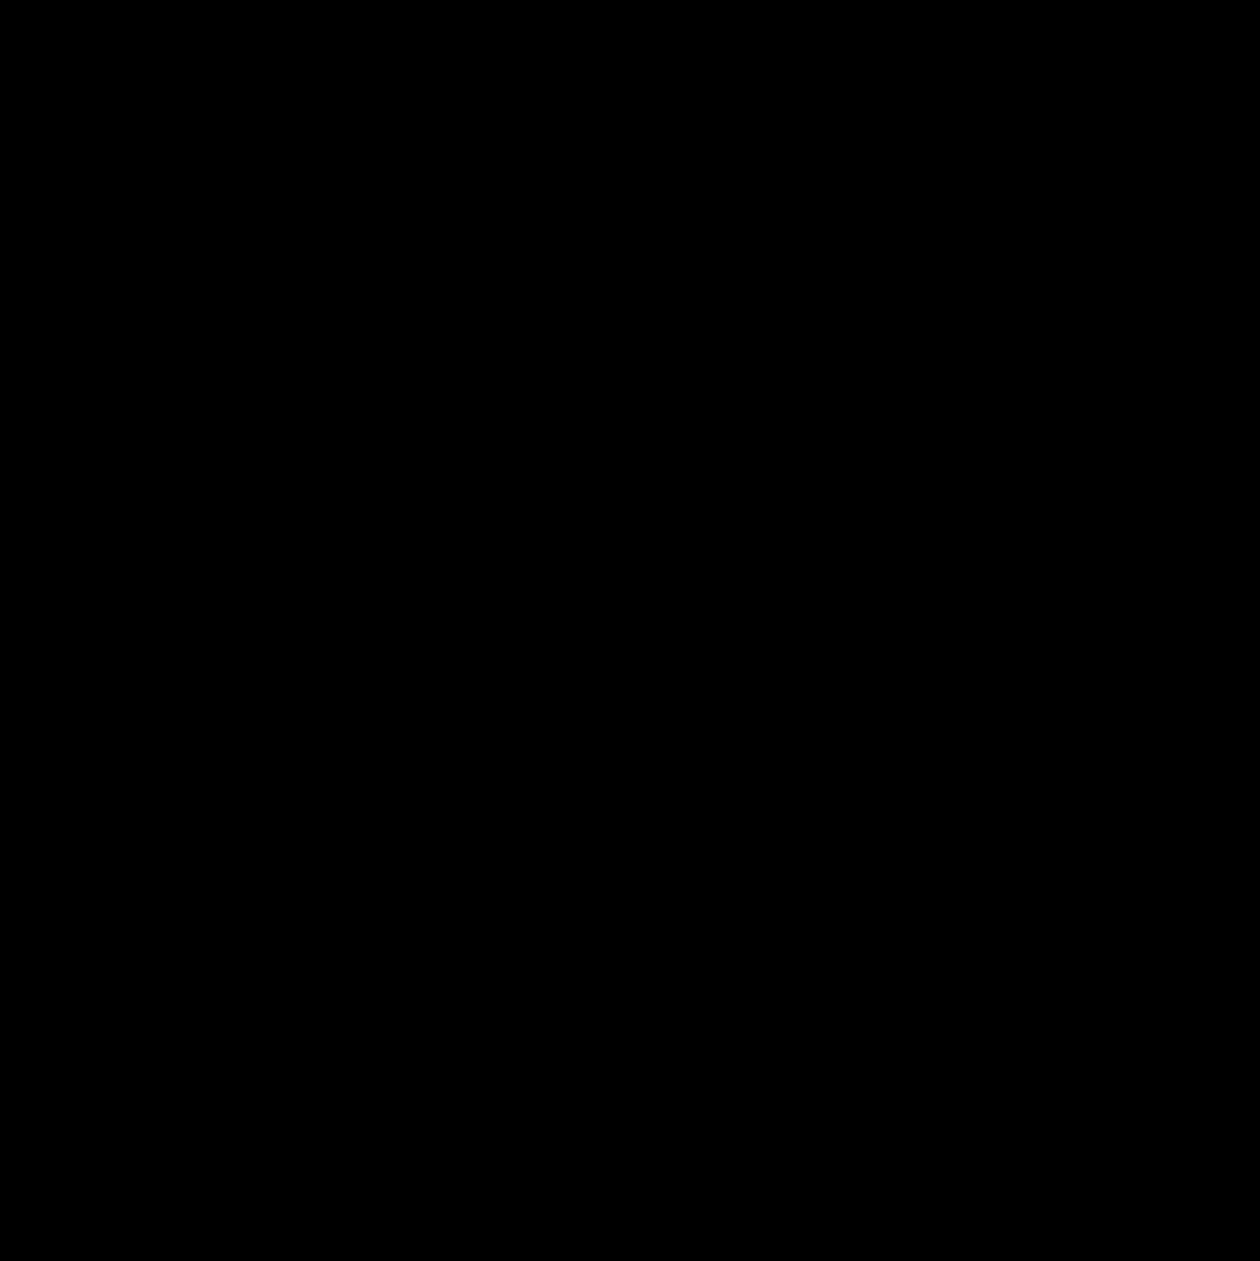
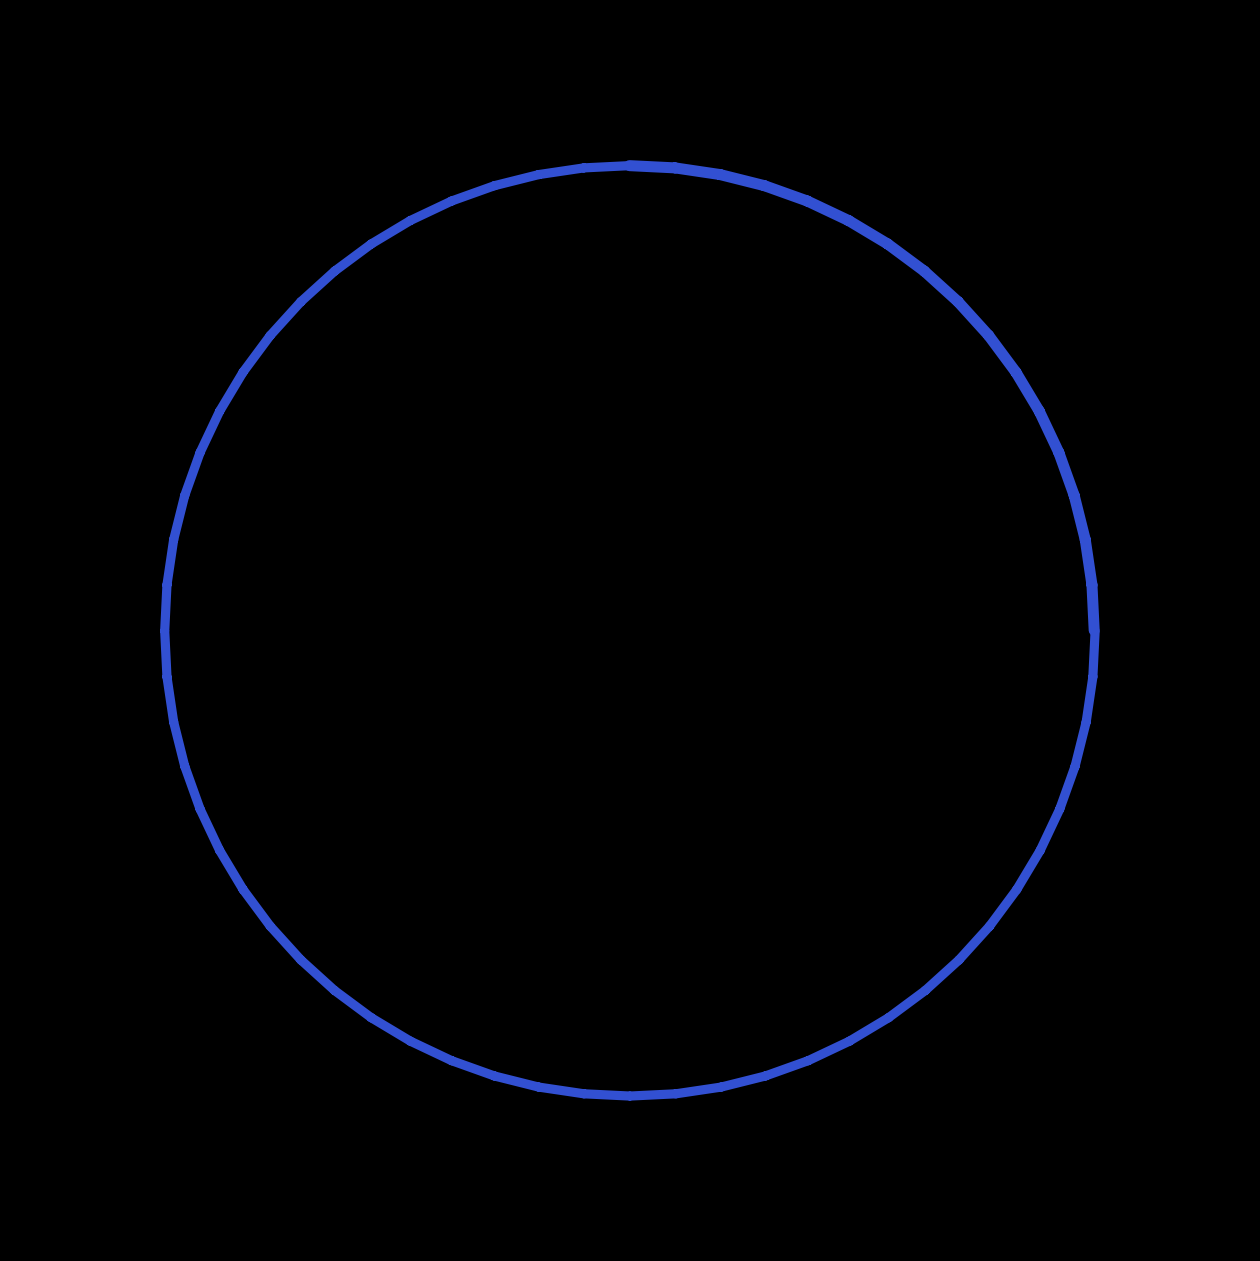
bottom track: none -> (164, 630) (166, 584) (173, 539) (184, 495) (200, 452) (219, 411) (243, 372) (270, 335) (300, 301) (334, 271) (371, 243) (410, 220) (451, 201) (494, 185) (538, 174) (583, 167) (629, 165) (675, 167) (720, 174) (764, 185) (807, 201) (848, 220) (887, 243) (924, 271) (958, 301) (988, 335) (1015, 372) (1039, 411) (1058, 452) (1074, 495) (1085, 539) (1091, 584) (1094, 630)
bottom track: none -> (164, 631) (166, 676) (173, 721) (184, 766) (200, 809) (219, 850) (243, 889) (270, 926) (300, 959) (334, 990) (371, 1017) (410, 1041) (451, 1060) (494, 1076) (538, 1087) (583, 1093) (629, 1096)
bottom track: none -> (1095, 631) (1092, 676) (1086, 721) (1075, 766) (1059, 809) (1040, 850) (1016, 889) (989, 926) (958, 959) (925, 990) (888, 1017) (849, 1041) (808, 1060) (765, 1076) (721, 1087) (675, 1093) (630, 1096)

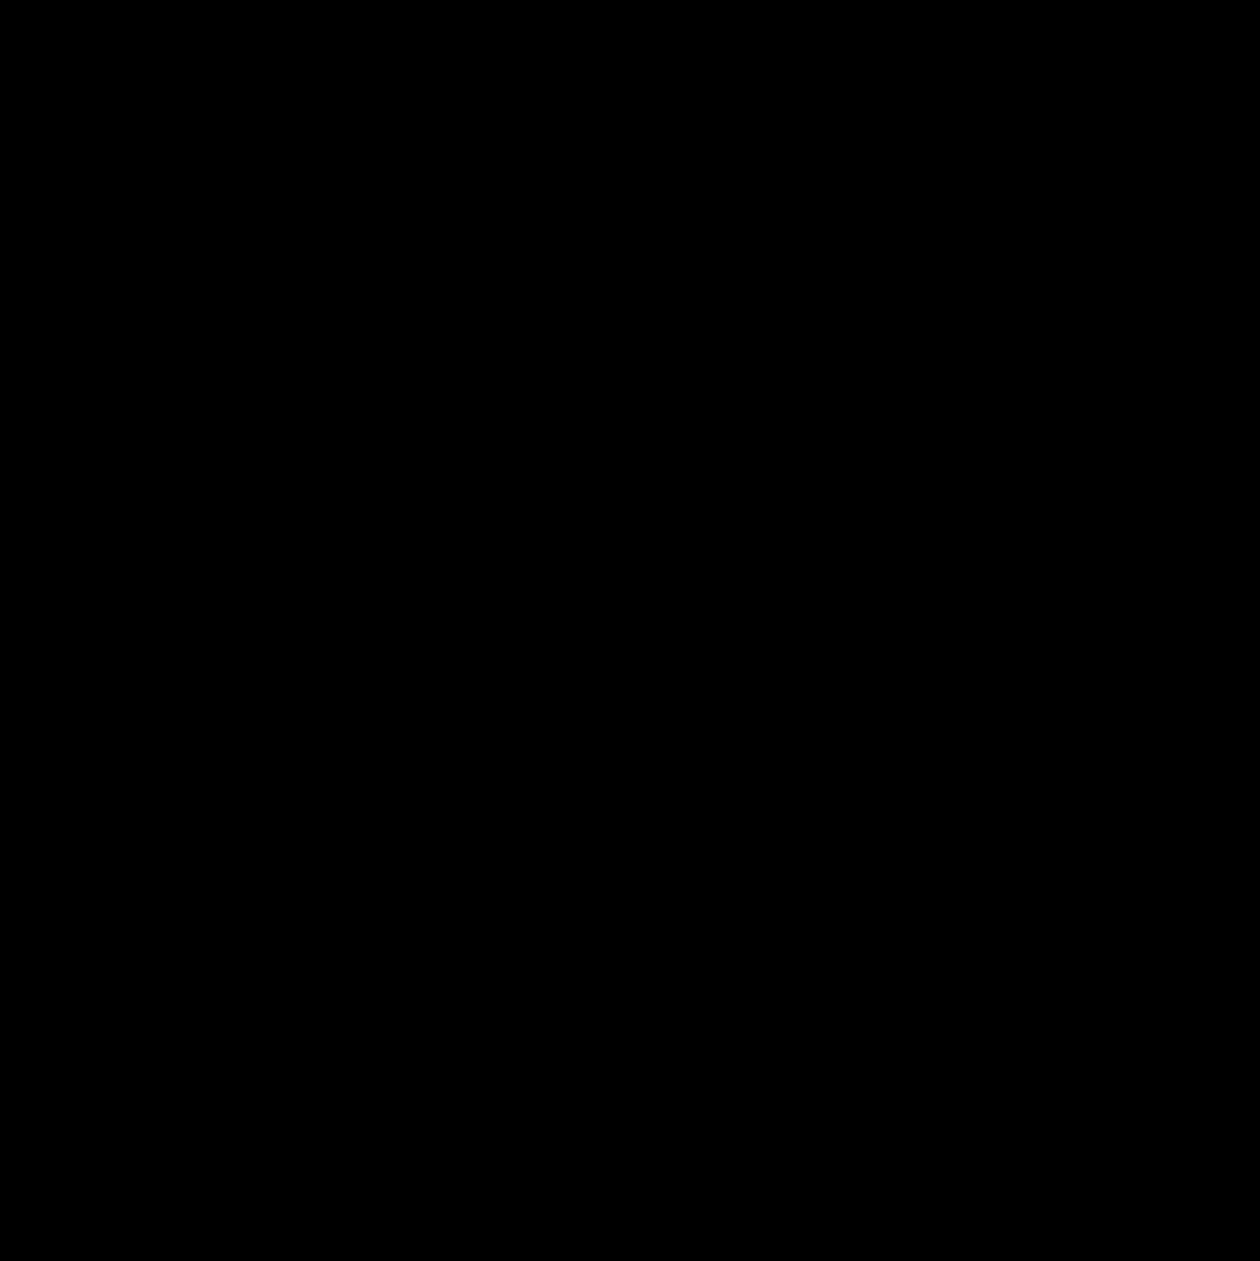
bottom track: (164, 630) (166, 584) (173, 539) (184, 495) (200, 452) (219, 411) (243, 372) (270, 335) (300, 301) (334, 271) (371, 243) (410, 220) (451, 201) (494, 185) (538, 174) (583, 167) (629, 165) (675, 167) (720, 174) (764, 185) (807, 201) (848, 220) (887, 243) (924, 271) (958, 301) (988, 335) (1015, 372) (1039, 411) (1058, 452) (1074, 495) (1085, 539) (1091, 584) (1094, 630) -> none
bottom track: (164, 631) (166, 676) (173, 721) (184, 766) (200, 809) (219, 850) (243, 889) (270, 926) (300, 959) (334, 990) (371, 1017) (410, 1041) (451, 1060) (494, 1076) (538, 1087) (583, 1093) (629, 1096) -> none
bottom track: (1095, 631) (1092, 676) (1086, 721) (1075, 766) (1059, 809) (1040, 850) (1016, 889) (989, 926) (958, 959) (925, 990) (888, 1017) (849, 1041) (808, 1060) (765, 1076) (721, 1087) (675, 1093) (630, 1096) -> none

